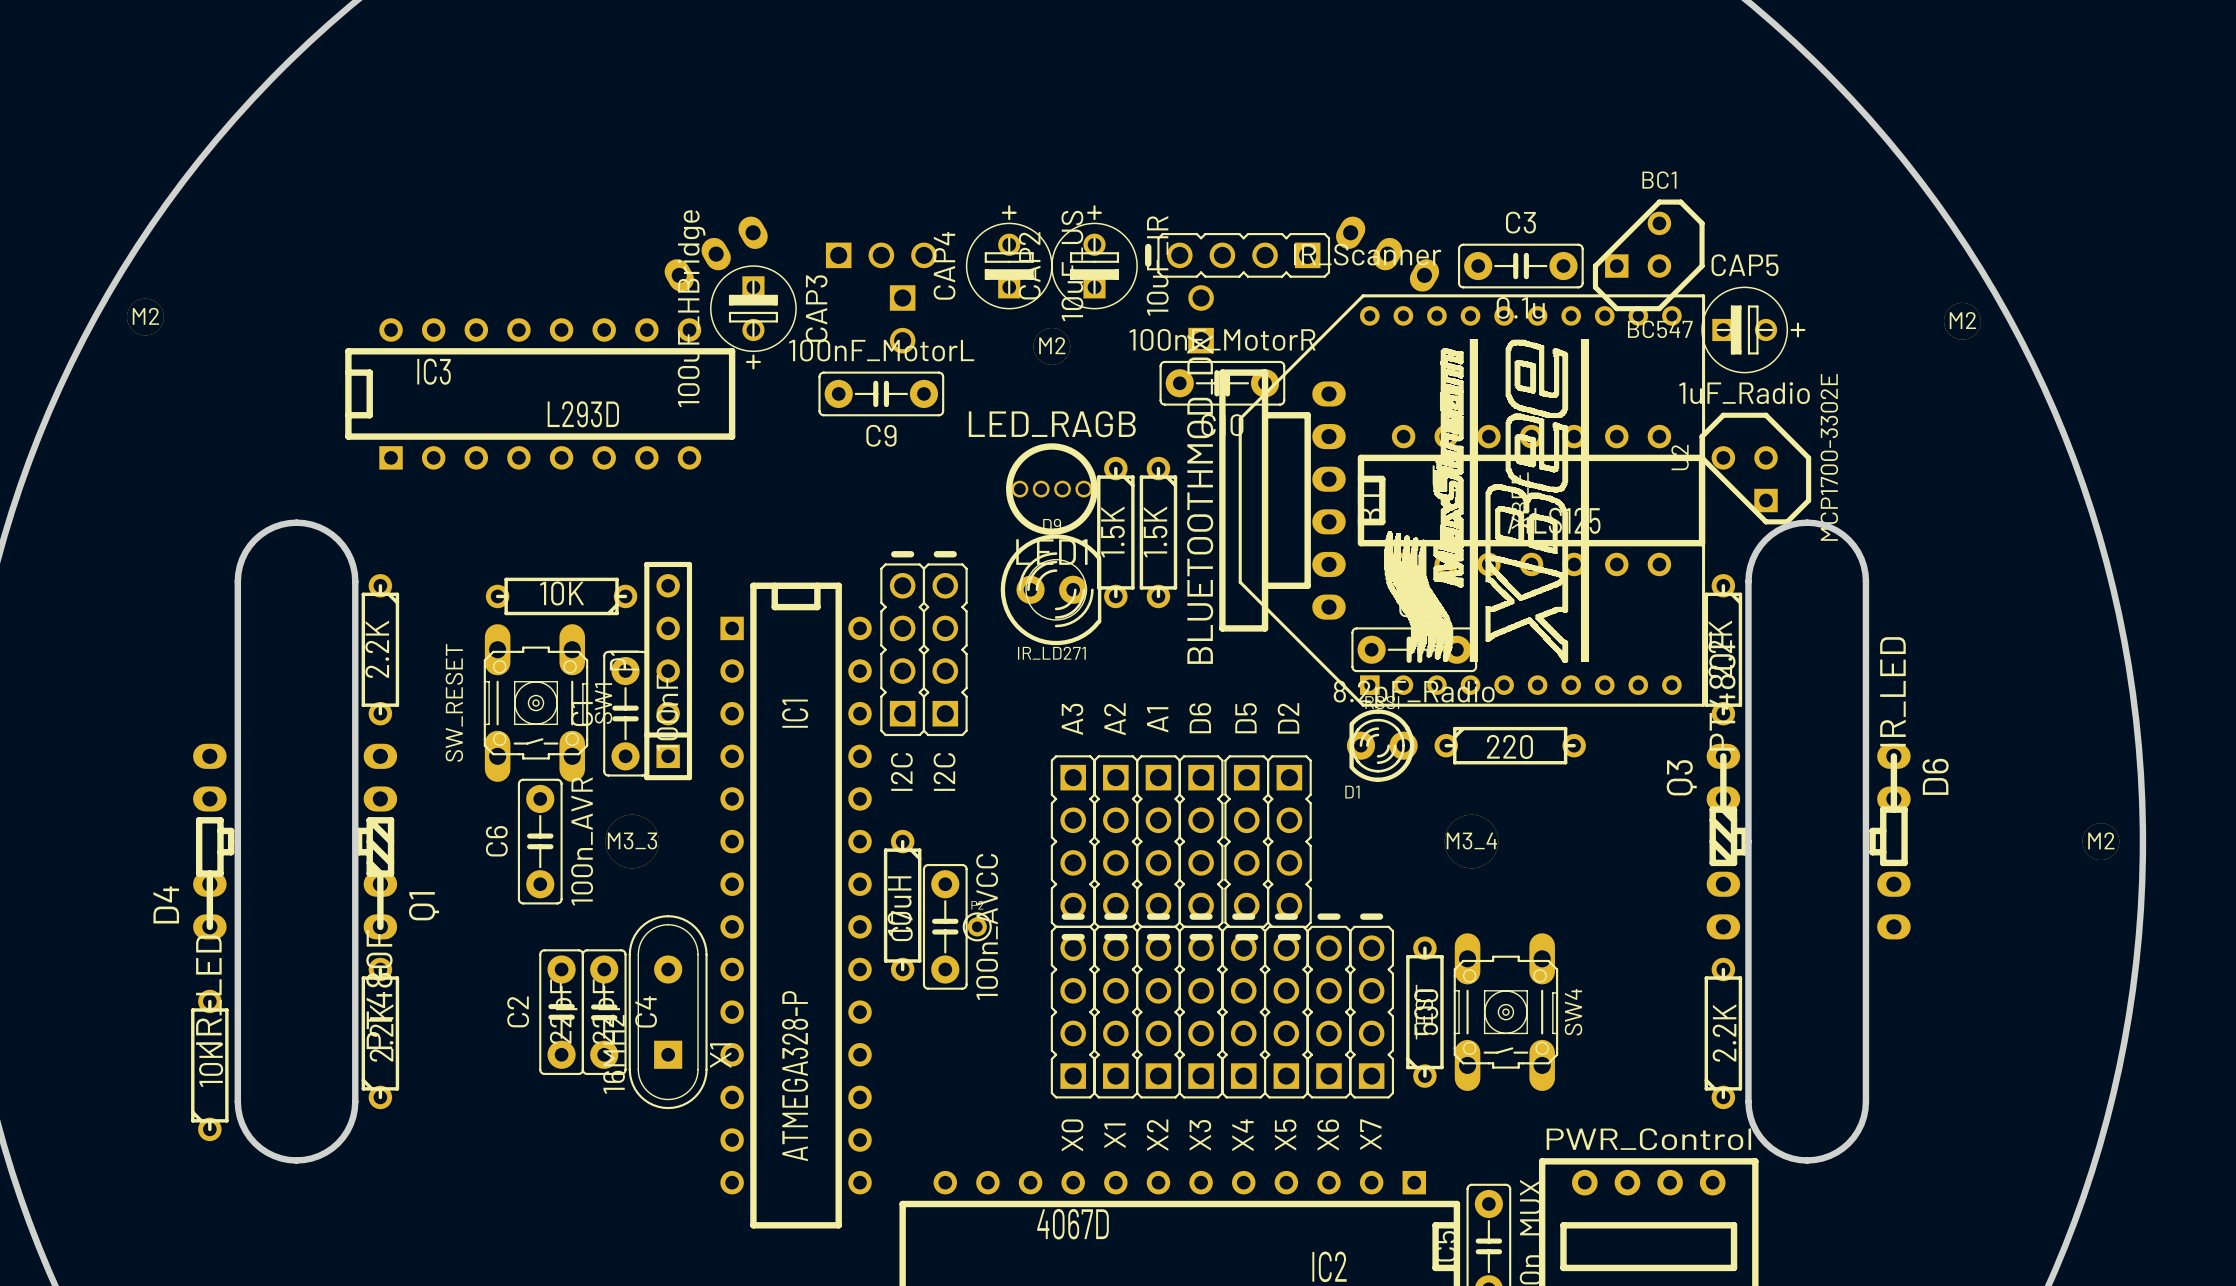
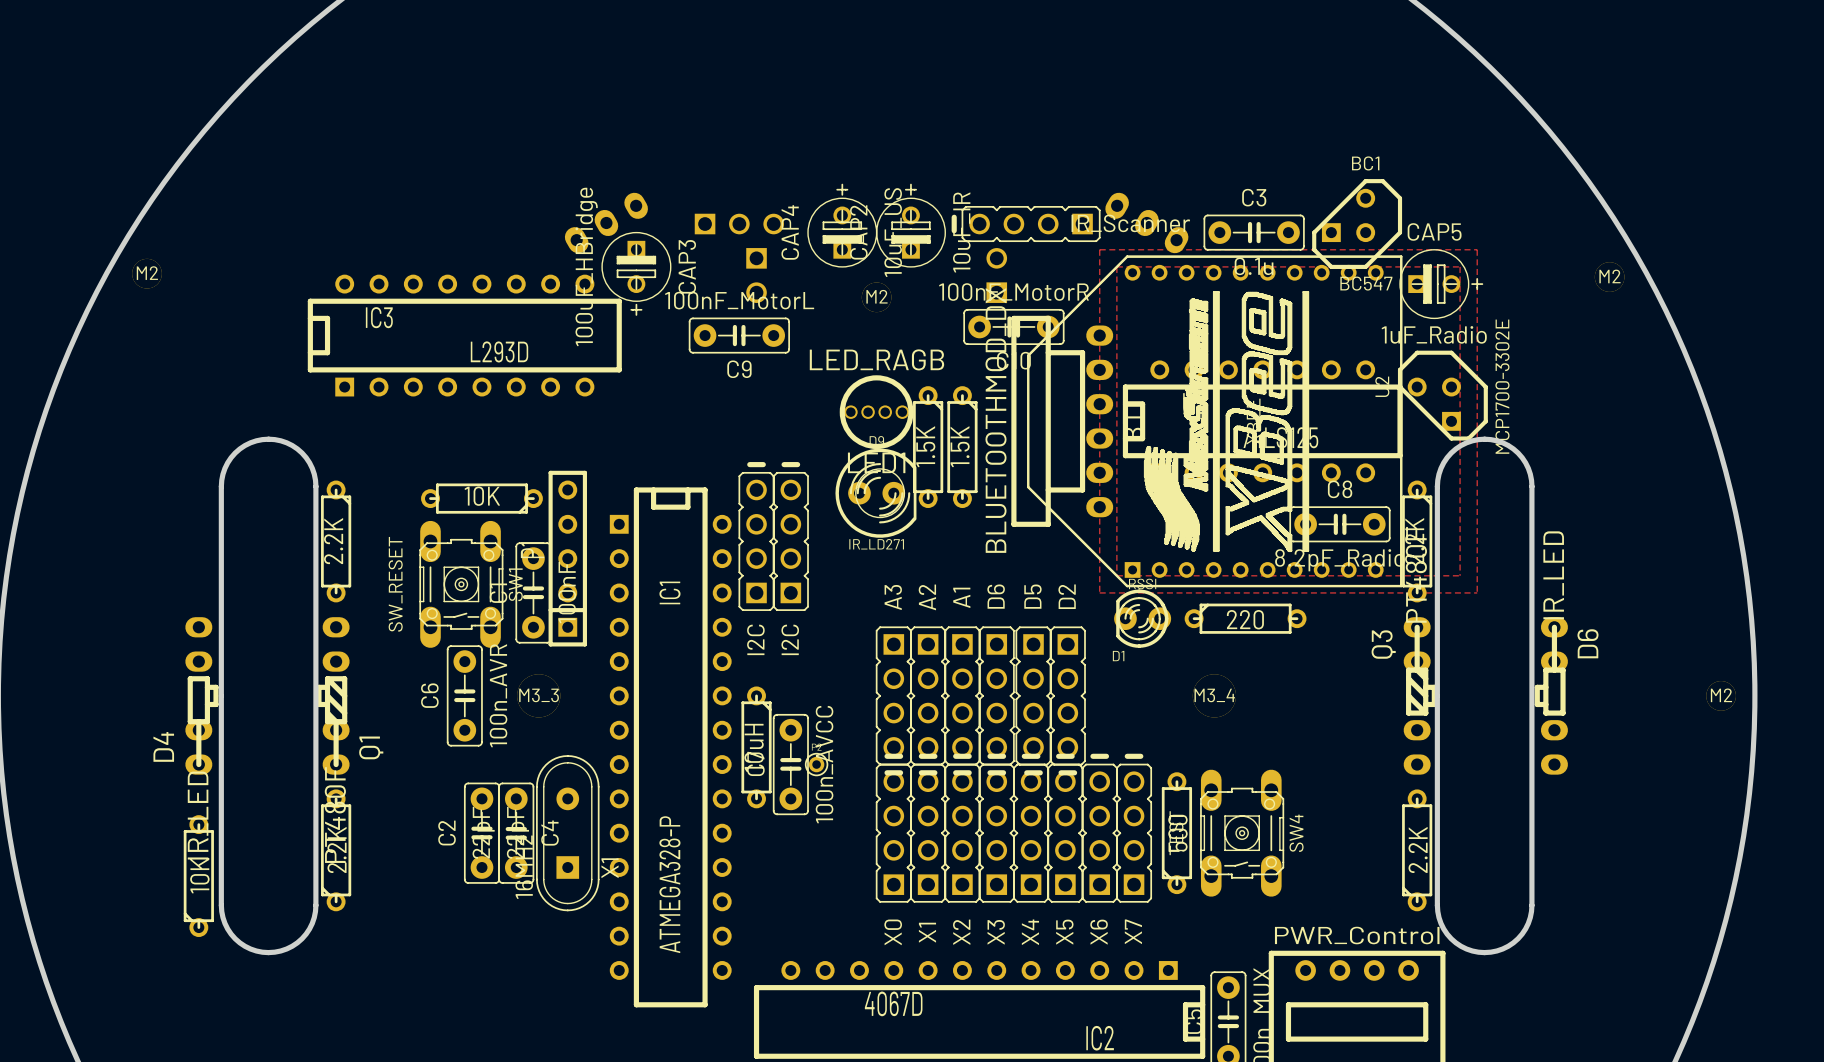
top zone outline: none -> (1099, 249) (1099, 592) (1477, 592) (1477, 249) (1099, 249)
top zone outline: none -> (1116, 266) (1460, 266) (1460, 575) (1116, 575) (1116, 266)
C8 position: (1414, 649) -> (1339, 524)

